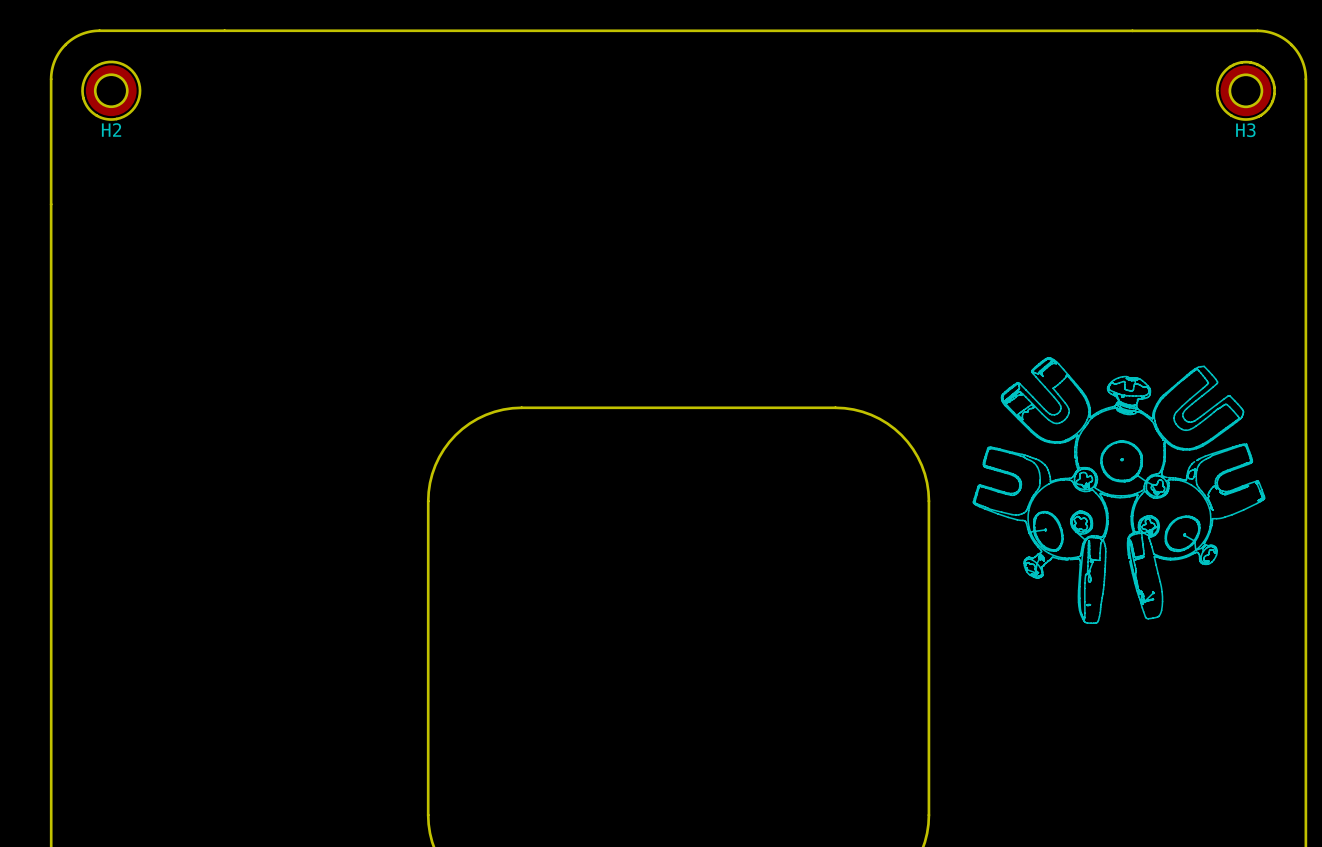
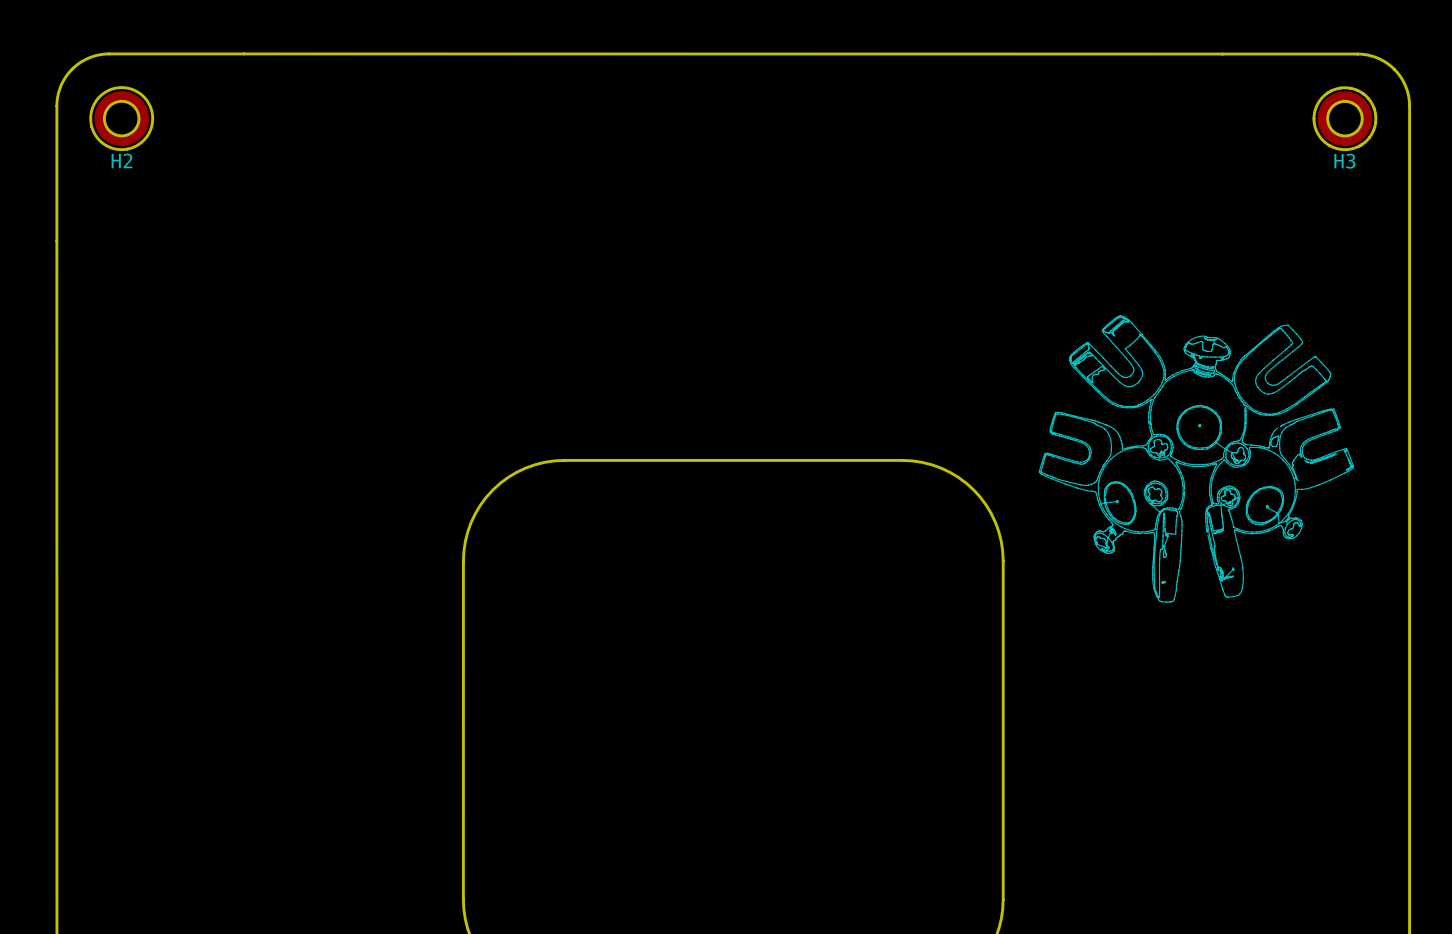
drawing position: (1118, 490) -> (1196, 458)

